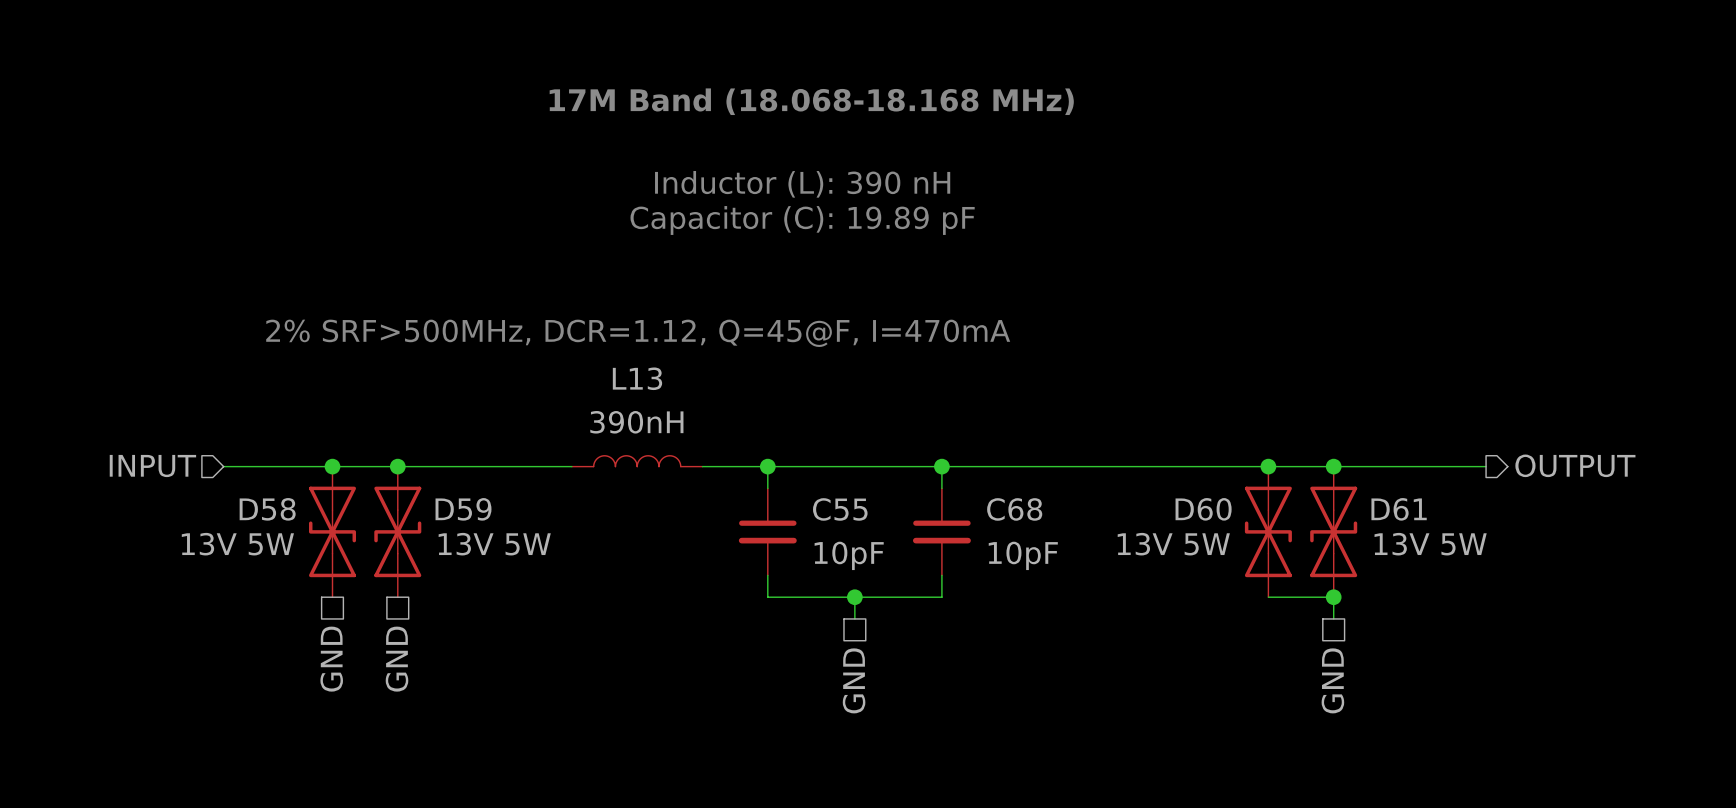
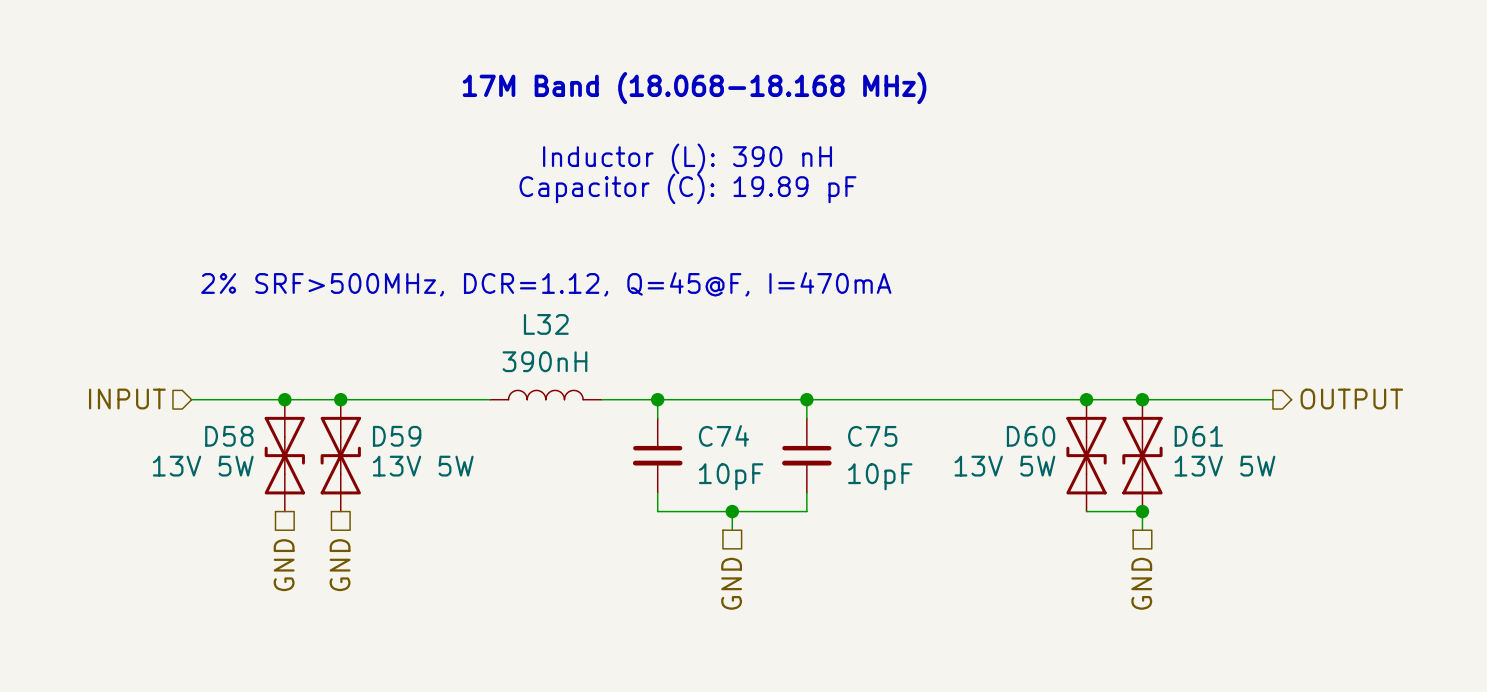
L13 name: L13 (637, 378) -> L32 (546, 324)
C55 name: C55 (840, 509) -> C74 (723, 435)
C68 name: C68 (1014, 509) -> C75 (872, 436)

